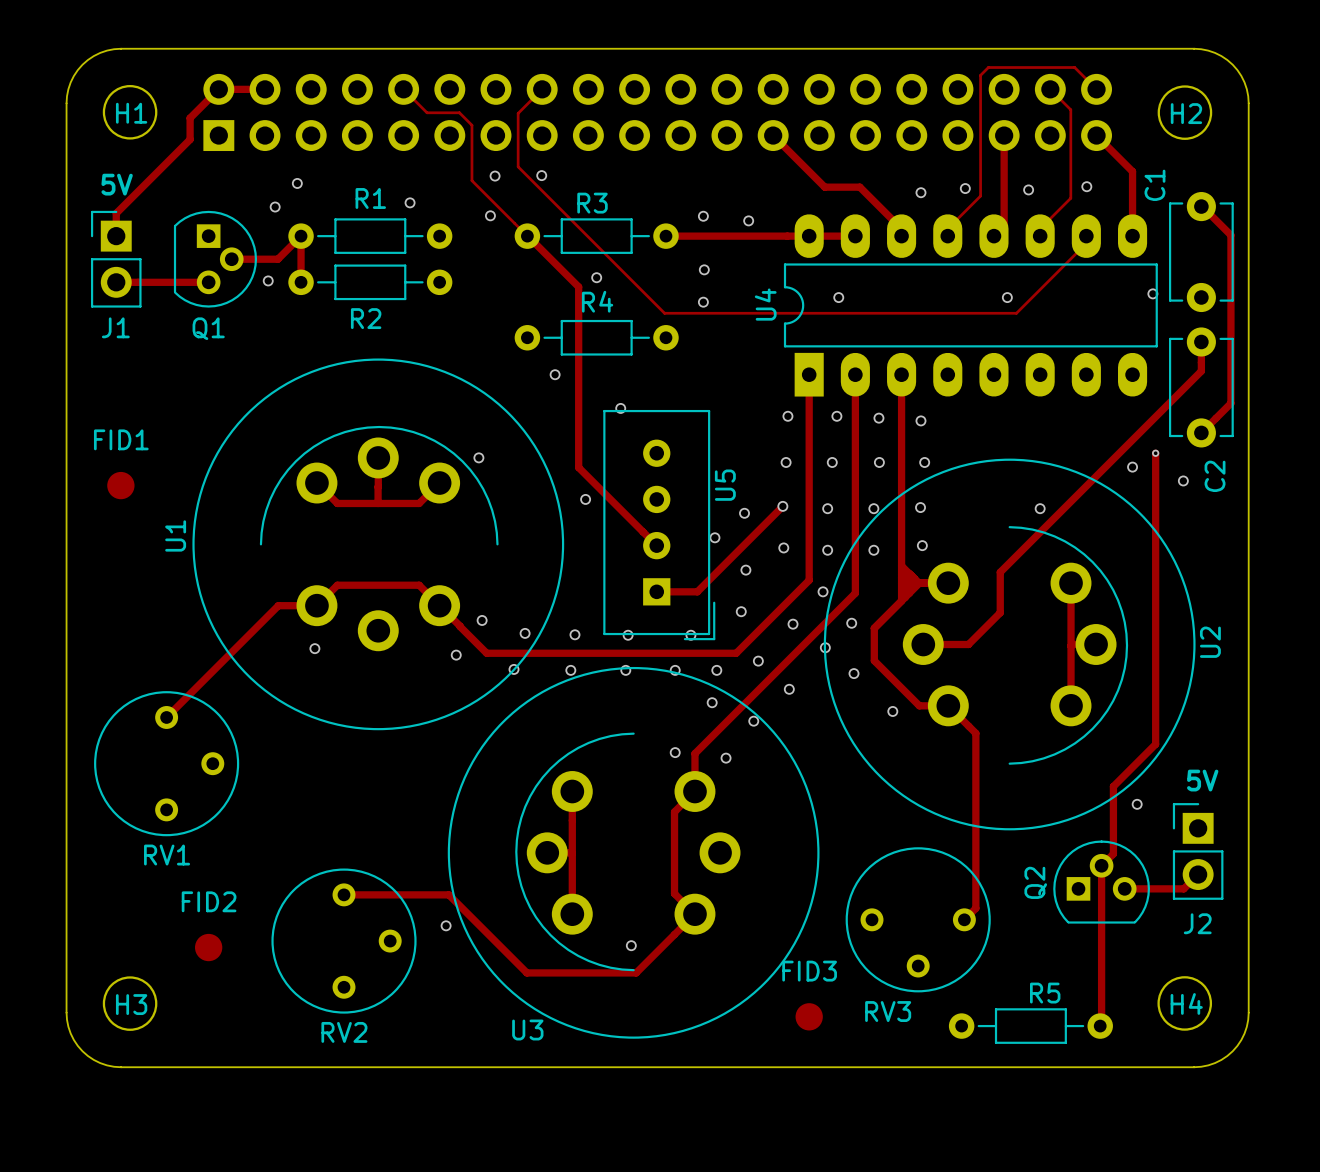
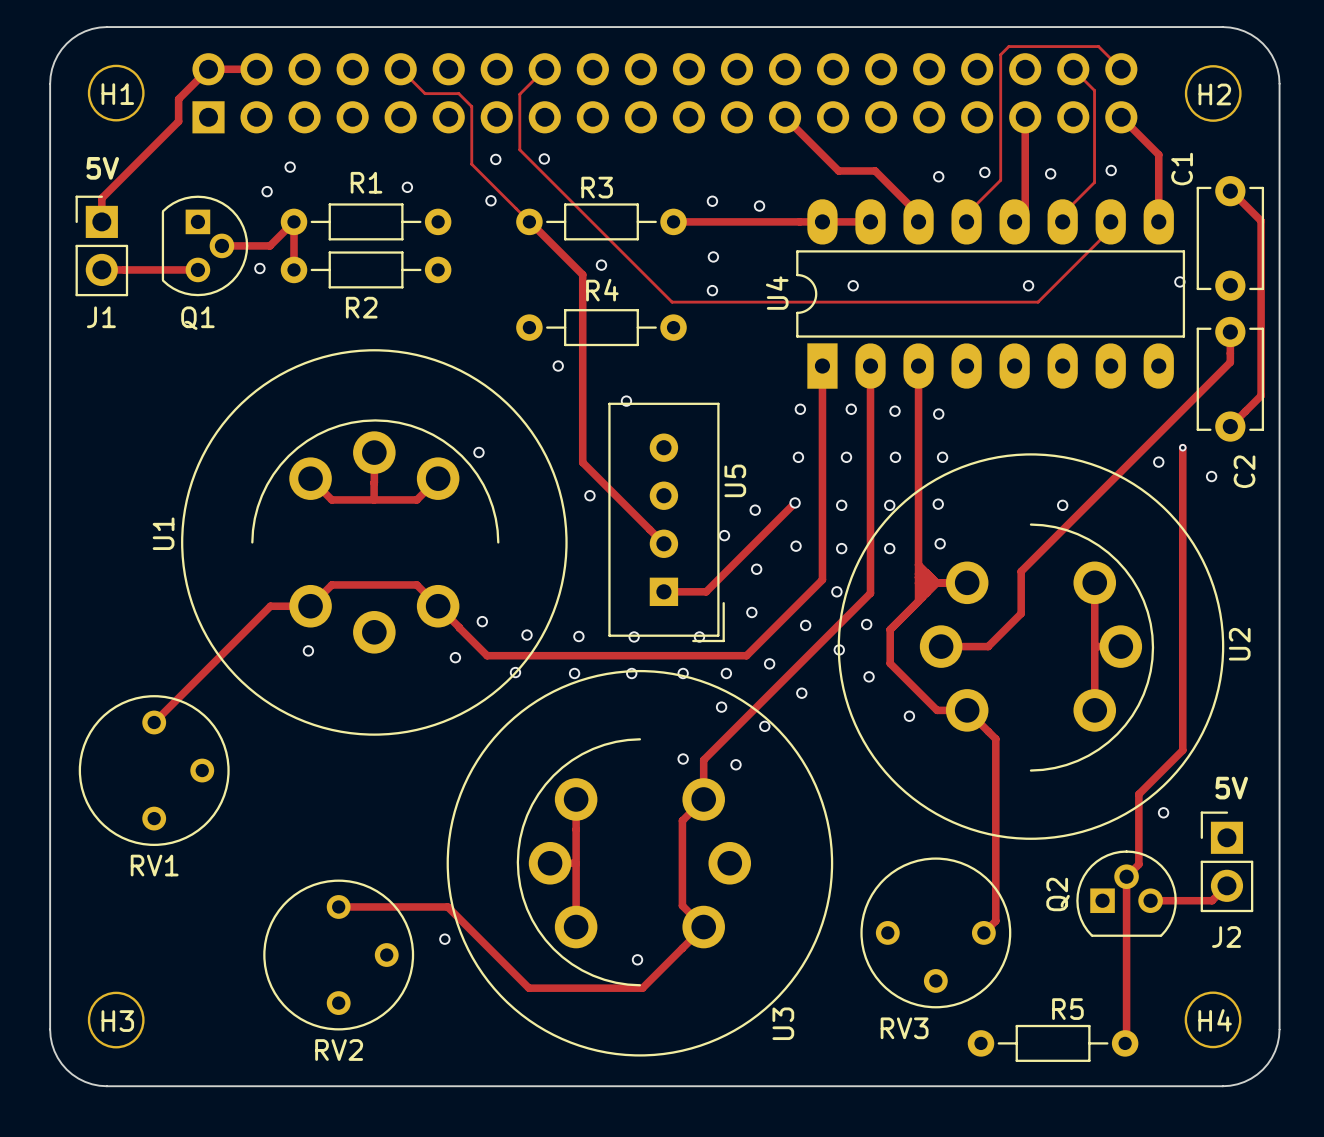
FID1: (120, 485) -> none
FID2: (208, 947) -> none
FID3: (809, 1016) -> none
U3 name rotation: 0° (527, 1030) -> 90° counterclockwise (783, 1023)
U3 name position: U3 (527, 1030) -> U3 (783, 1023)

